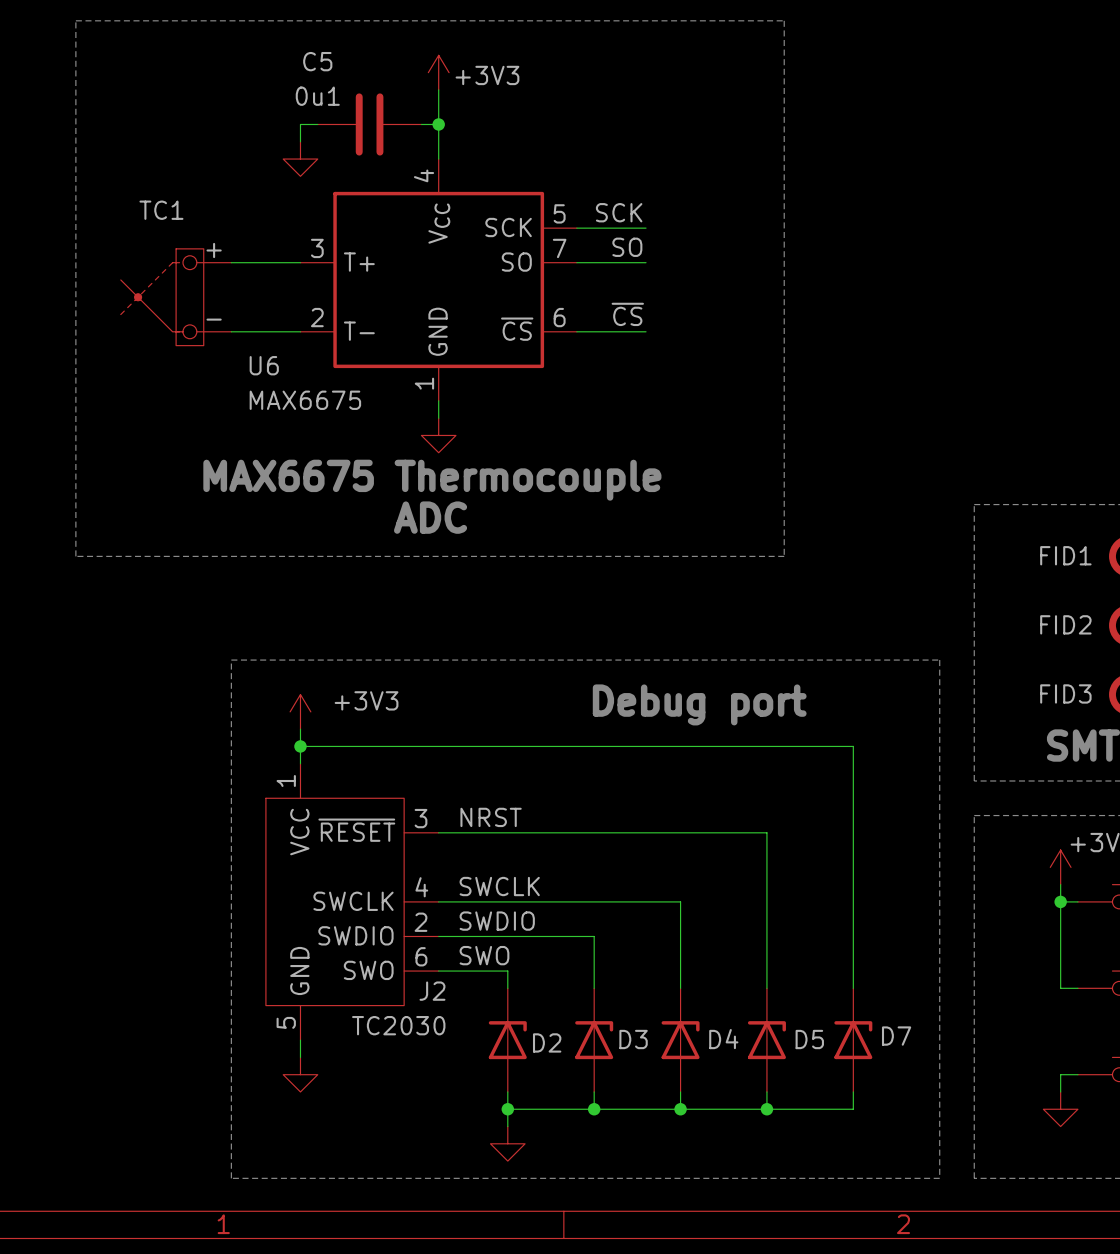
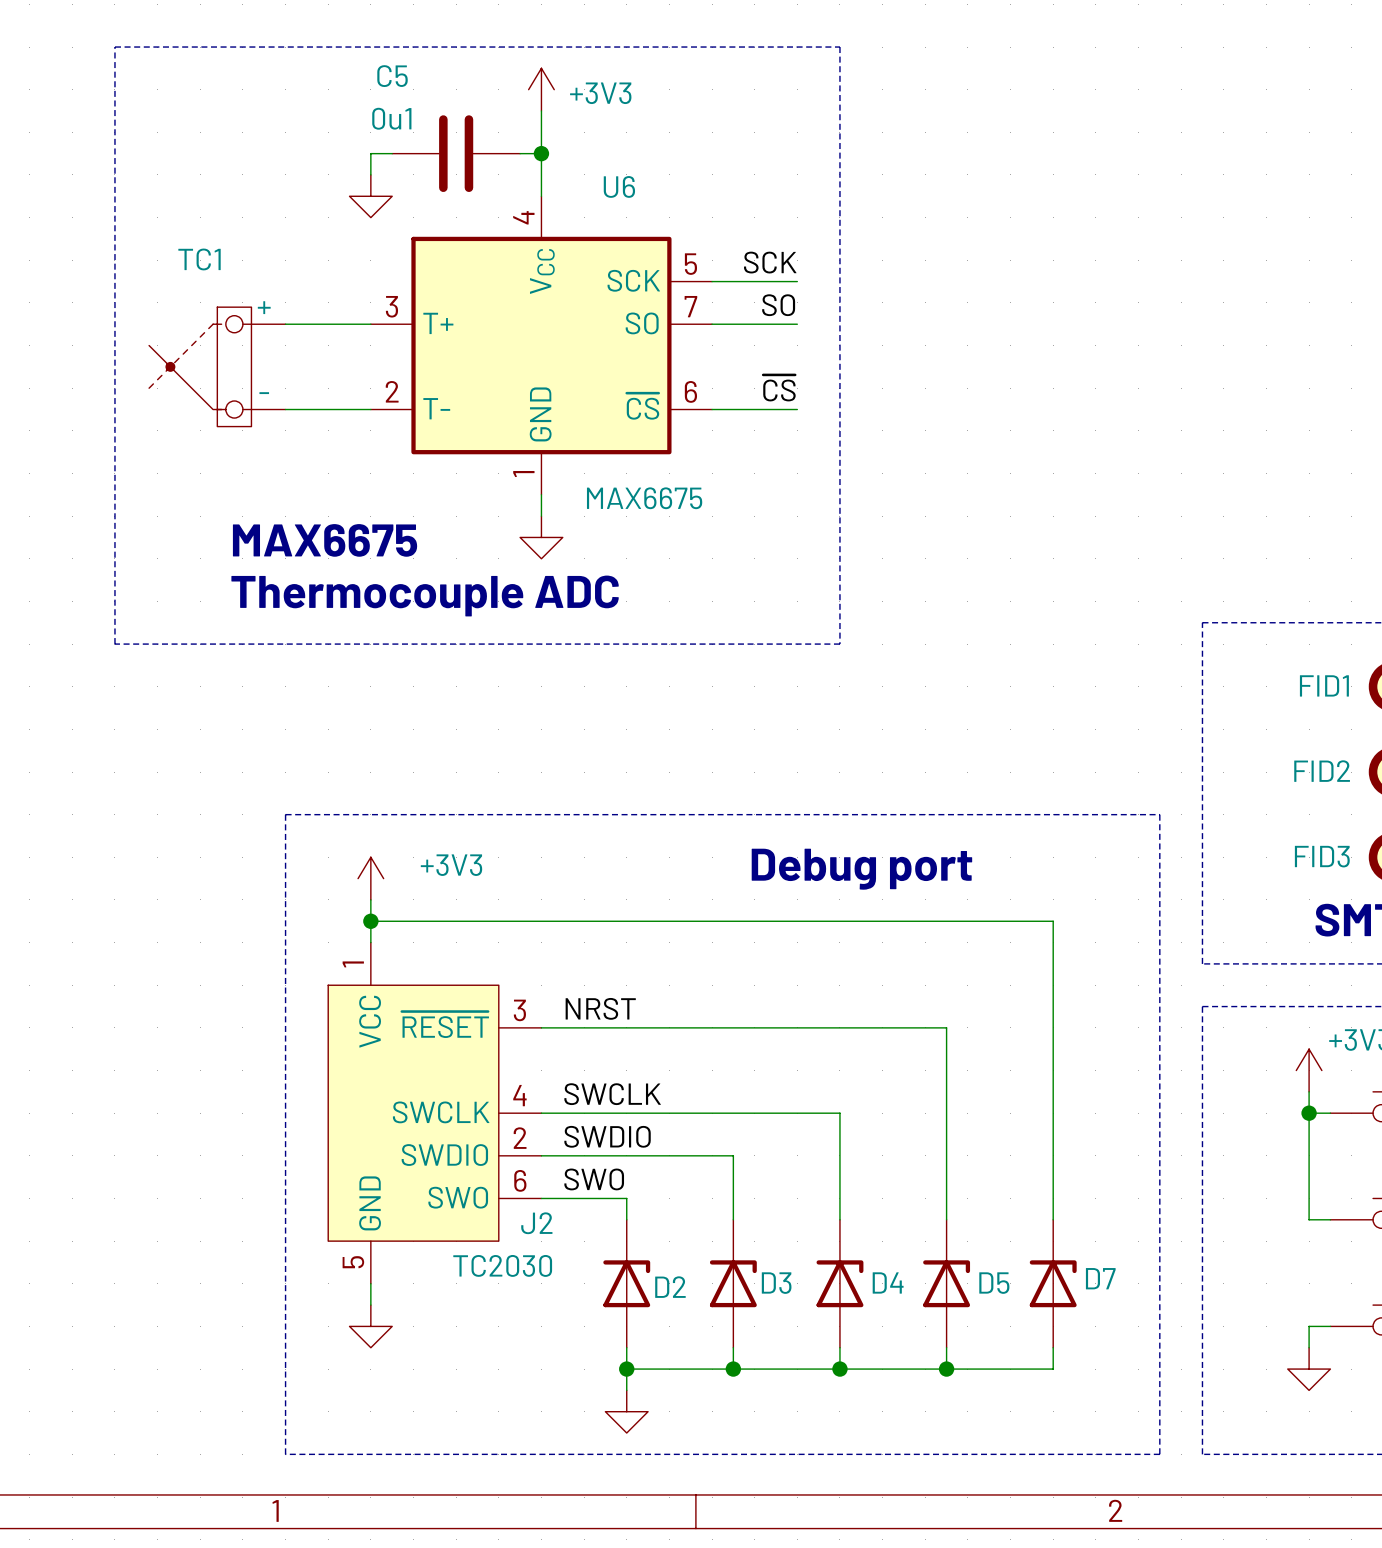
line: (75, 20) (784, 20) (784, 556) (75, 556) (75, 20) -> (114, 47) (114, 644) (839, 644) (839, 47) (114, 47)
U6 name position: U6 (264, 365) -> U6 (619, 186)
U6 value position: MAX6675 (305, 400) -> MAX6675 (644, 498)
text: none -> MAX6675 (325, 540)
text: MAX6675 Thermocouple (432, 480) -> Thermocouple ADC (425, 595)
text: ADC (430, 517) -> none

